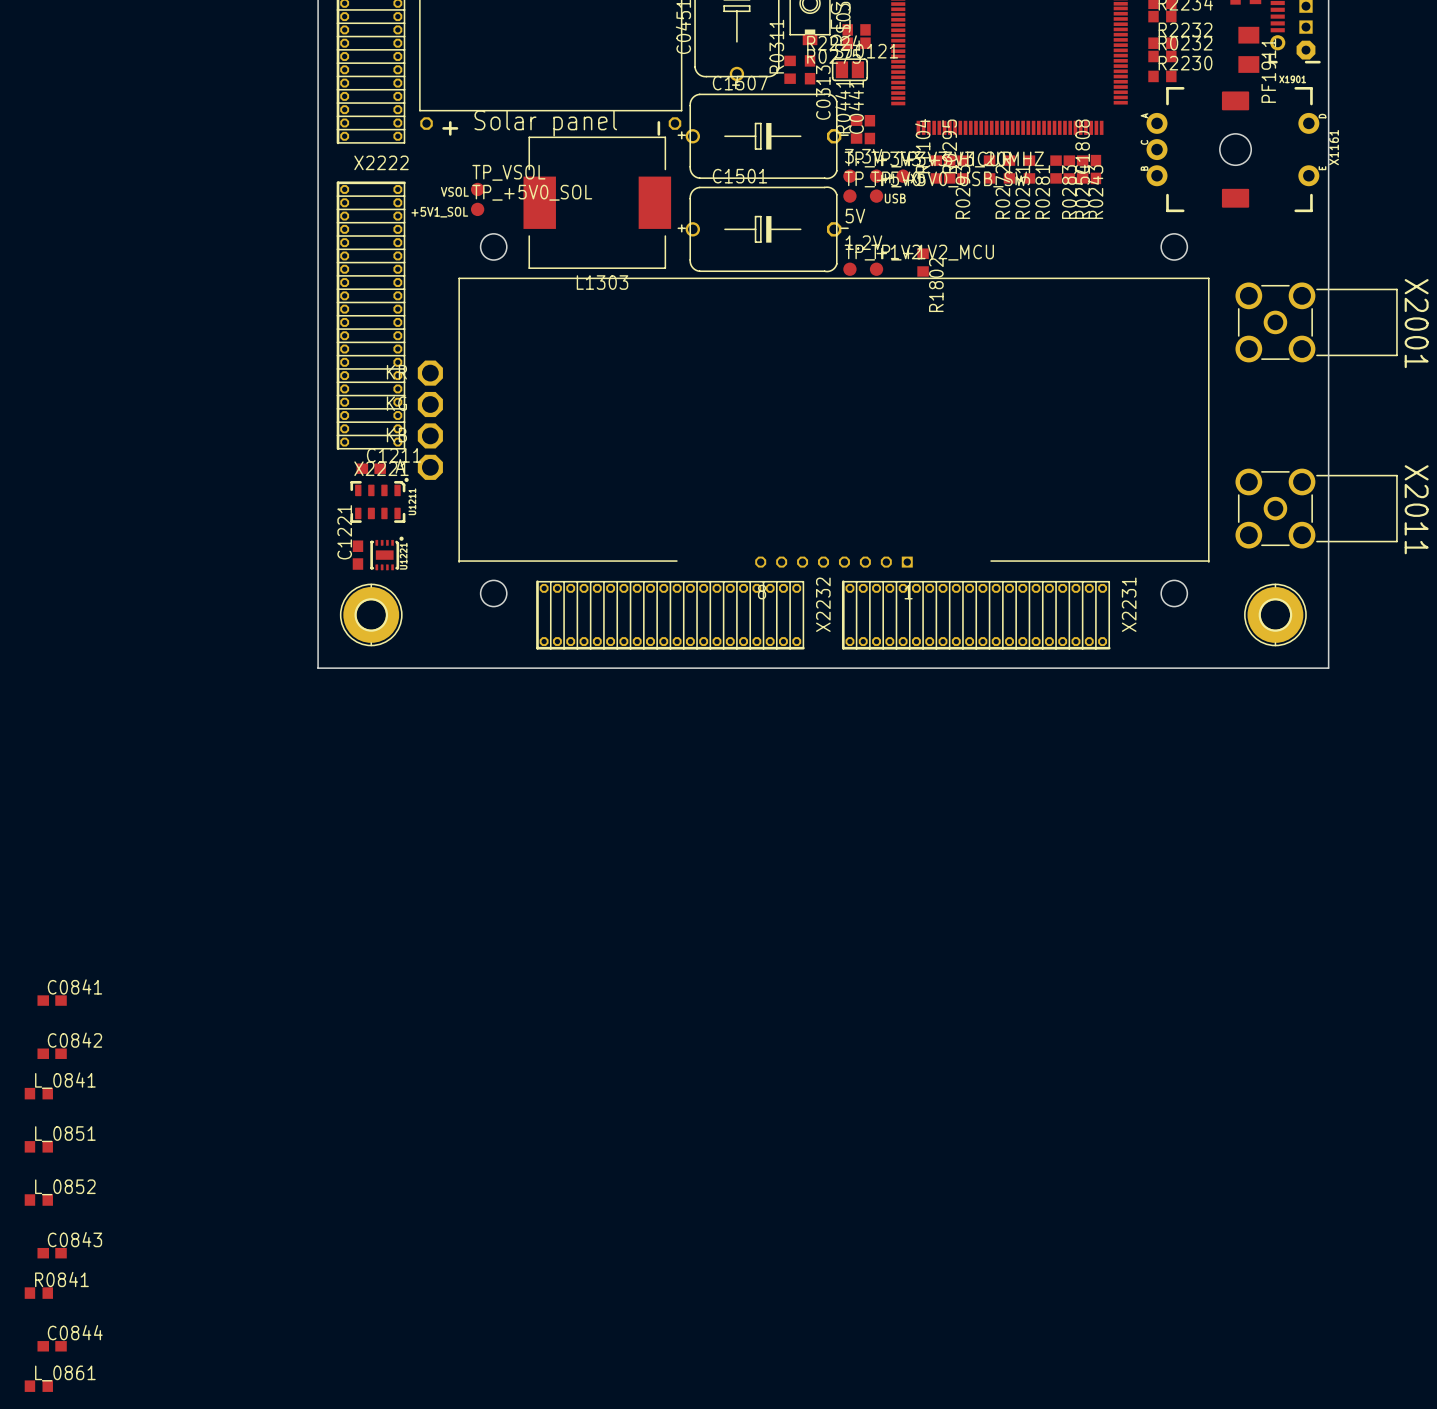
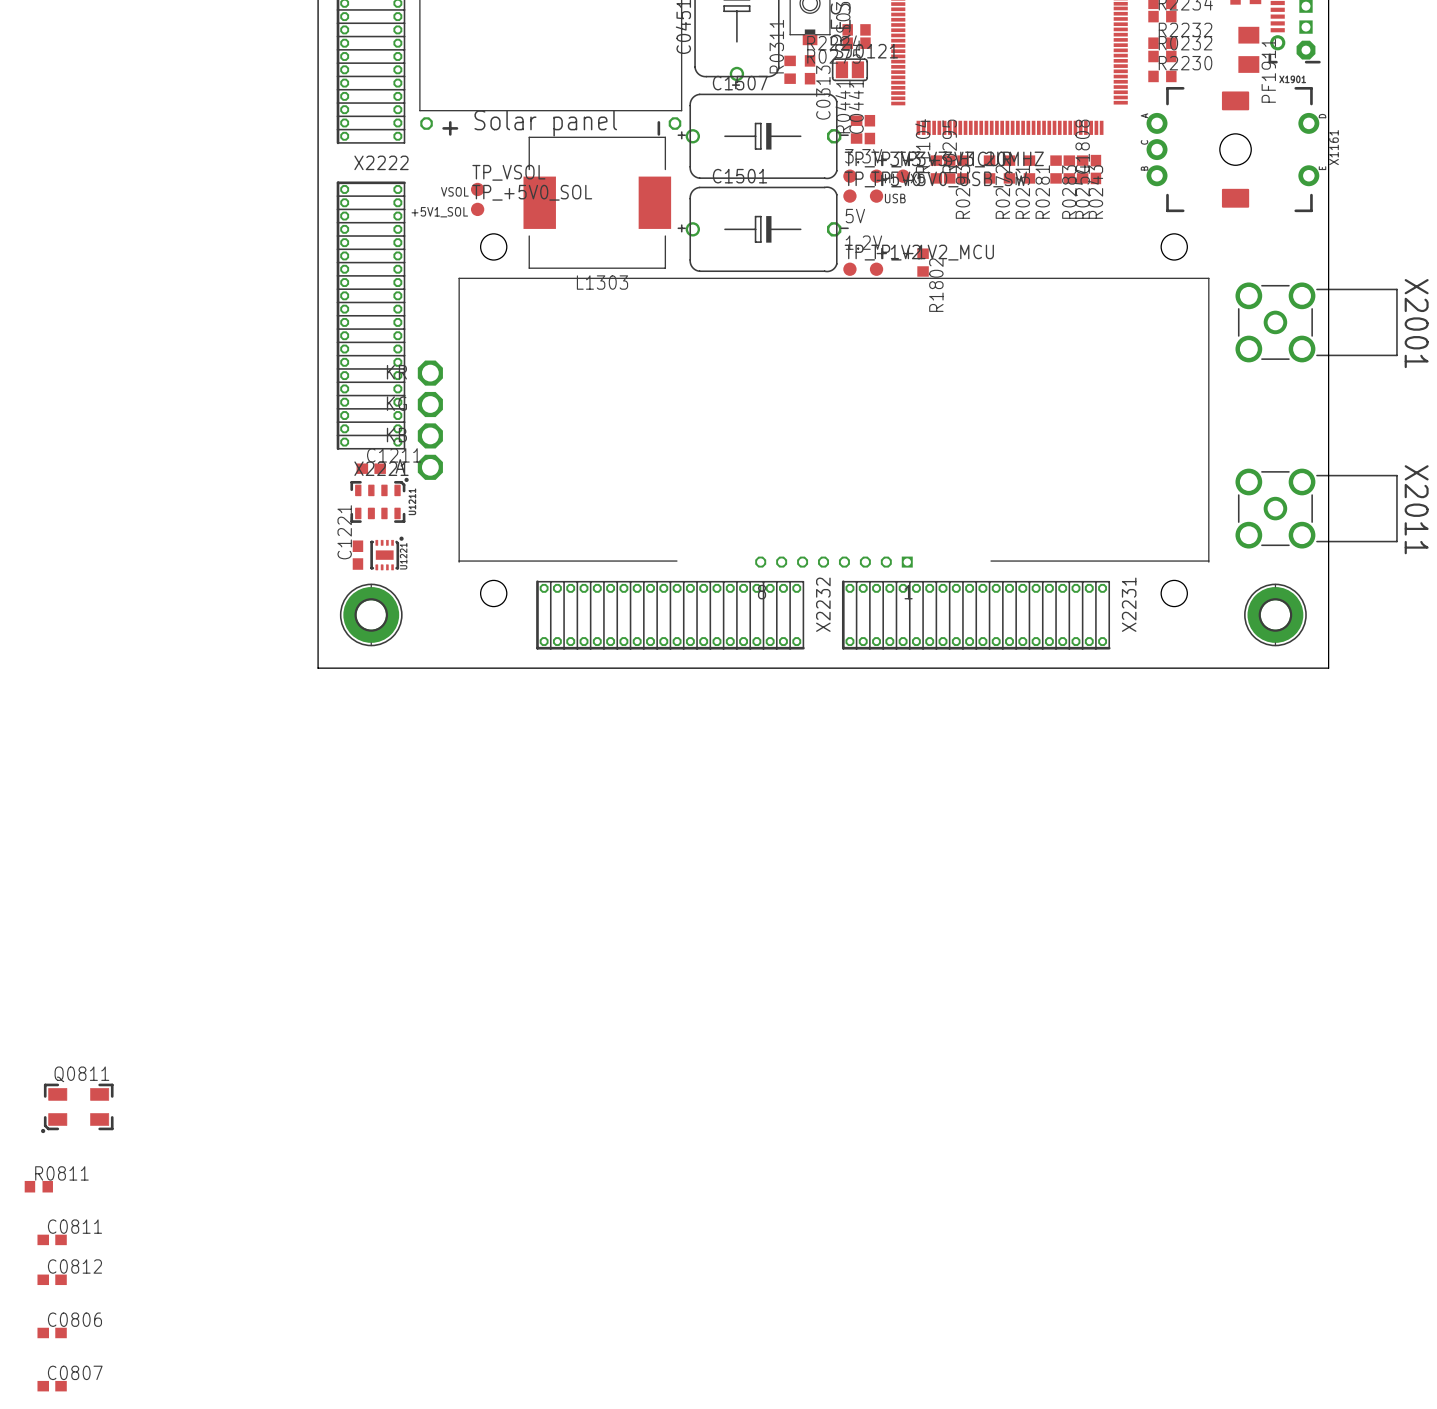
C0841: (52, 1000) -> none
C0842: (52, 1053) -> none
L_0841: (38, 1093) -> none
Q0811: none -> (77, 1108)
L_0851: (38, 1146) -> none
R0811: none -> (38, 1186)
L_0852: (38, 1200) -> none
C0811: none -> (52, 1239)
C0843: (52, 1253) -> none
C0812: none -> (52, 1279)
R0841: (38, 1293) -> none
C0806: none -> (52, 1332)
C0844: (52, 1346) -> none
L_0861: (38, 1386) -> none
C0807: none -> (52, 1386)

